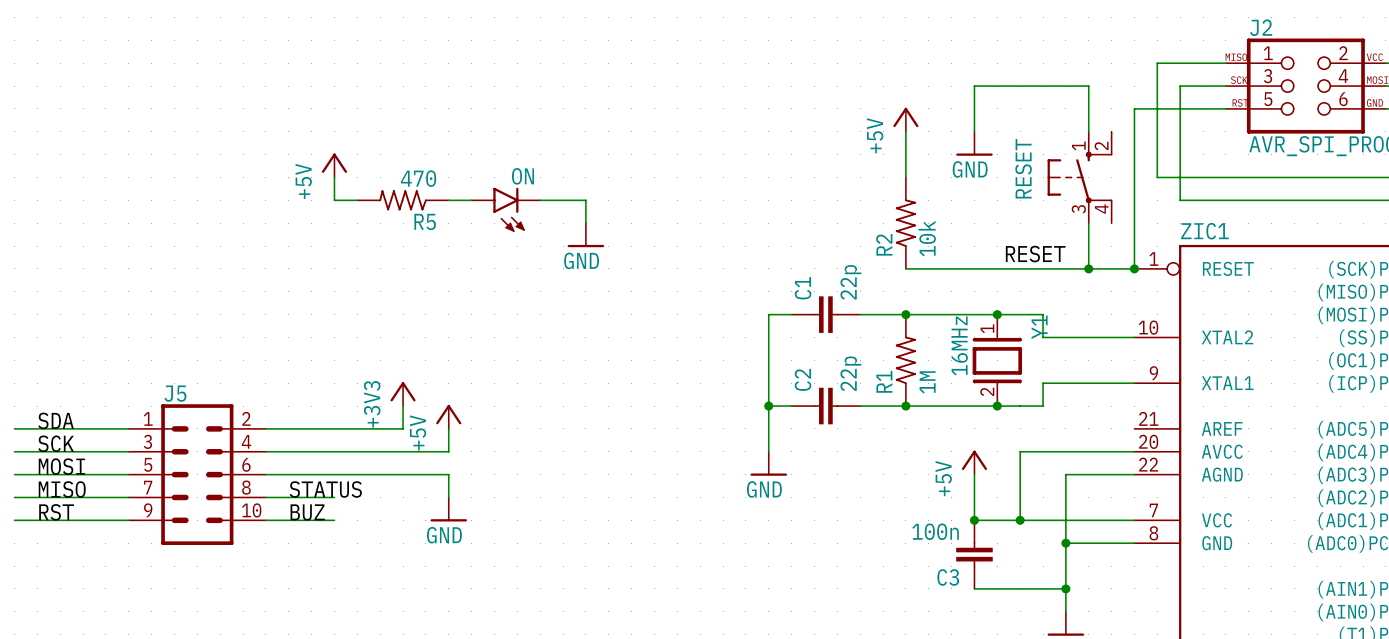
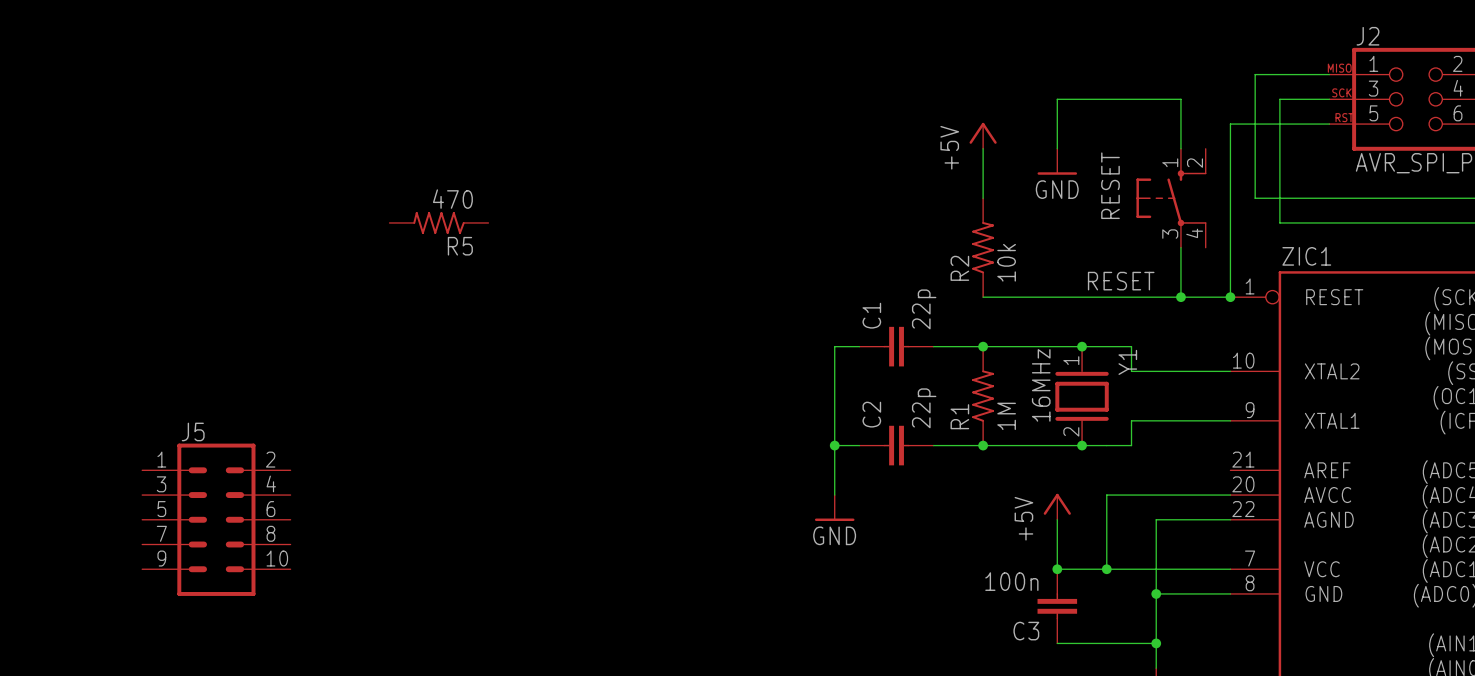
power symbol: +5V (334, 165) -> none
wire: (334, 177) (334, 200) (357, 200) -> none
wire: (448, 200) (471, 200) -> none
wire: (540, 200) (585, 200) (585, 223) -> none
ON: (505, 209) -> none
power symbol: GND (585, 235) -> none
power symbol: +3V3 (403, 394) -> none
wire: (403, 406) (403, 428) (265, 428) -> none
power symbol: +5V (448, 416) -> none
label: SDA (56, 420) -> none
wire: (14, 428) (128, 428) -> none
wire: (448, 428) (448, 451) (265, 451) -> none
label: SCK (56, 443) -> none
wire: (14, 451) (128, 451) -> none
label: MOSI (61, 466) -> none
wire: (14, 474) (128, 474) -> none
wire: (265, 474) (448, 474) (448, 497) -> none
label: MISO (62, 489) -> none
label: STATUS (325, 489) -> none
wire: (14, 497) (128, 497) -> none
wire: (265, 497) (334, 497) -> none
power symbol: GND (448, 509) -> none
label: RST (56, 512) -> none
label: BUZ (307, 512) -> none
wire: (14, 520) (128, 520) -> none
wire: (265, 520) (334, 520) -> none

